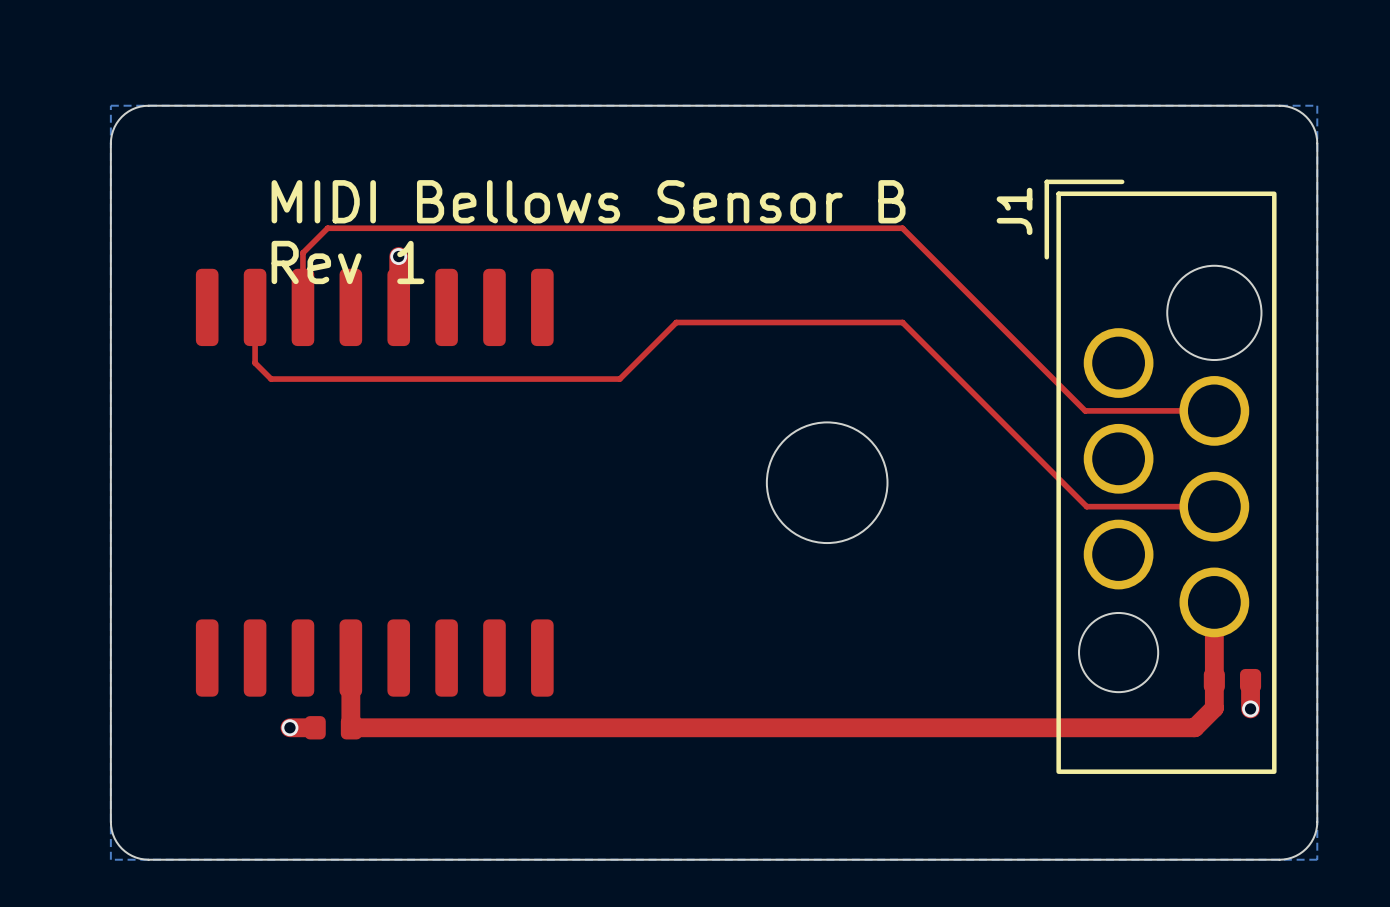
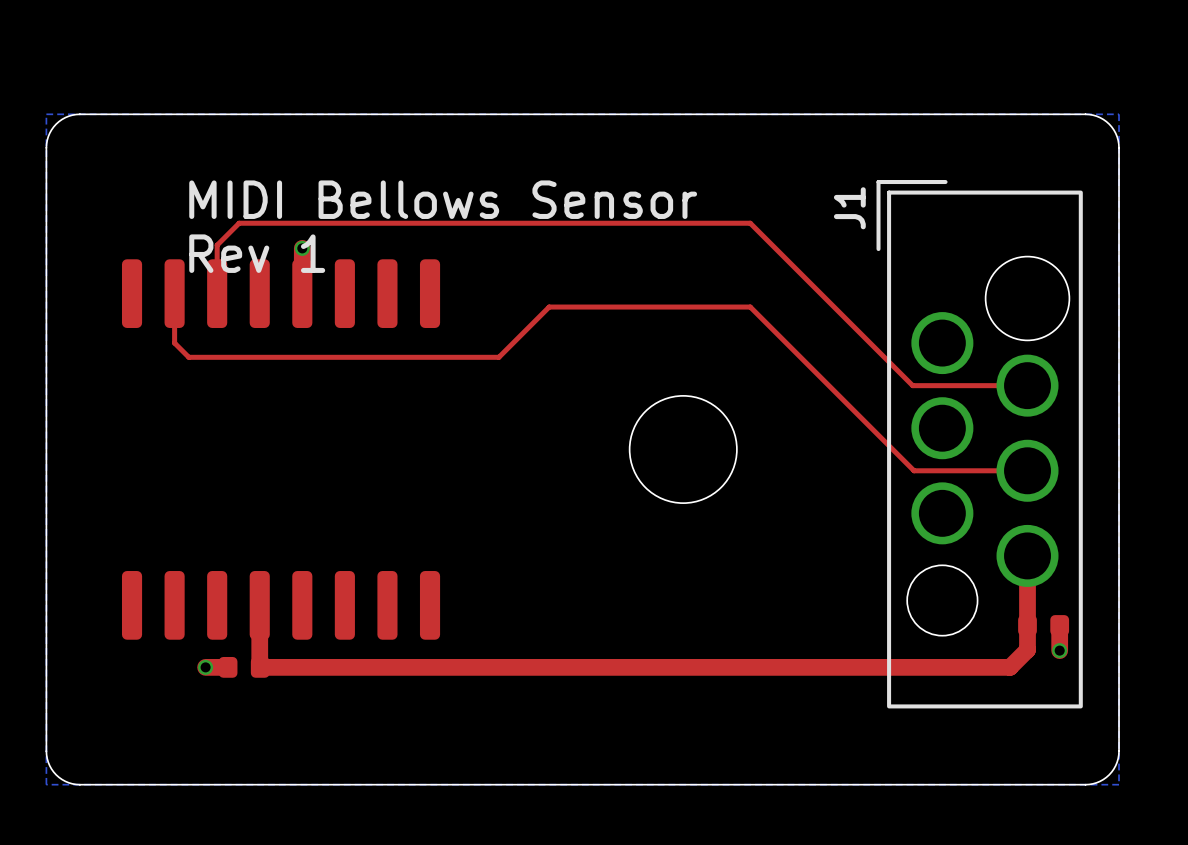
text: MIDI Bellows Sensor B (588, 201) -> MIDI Bellows Sensor (443, 199)

